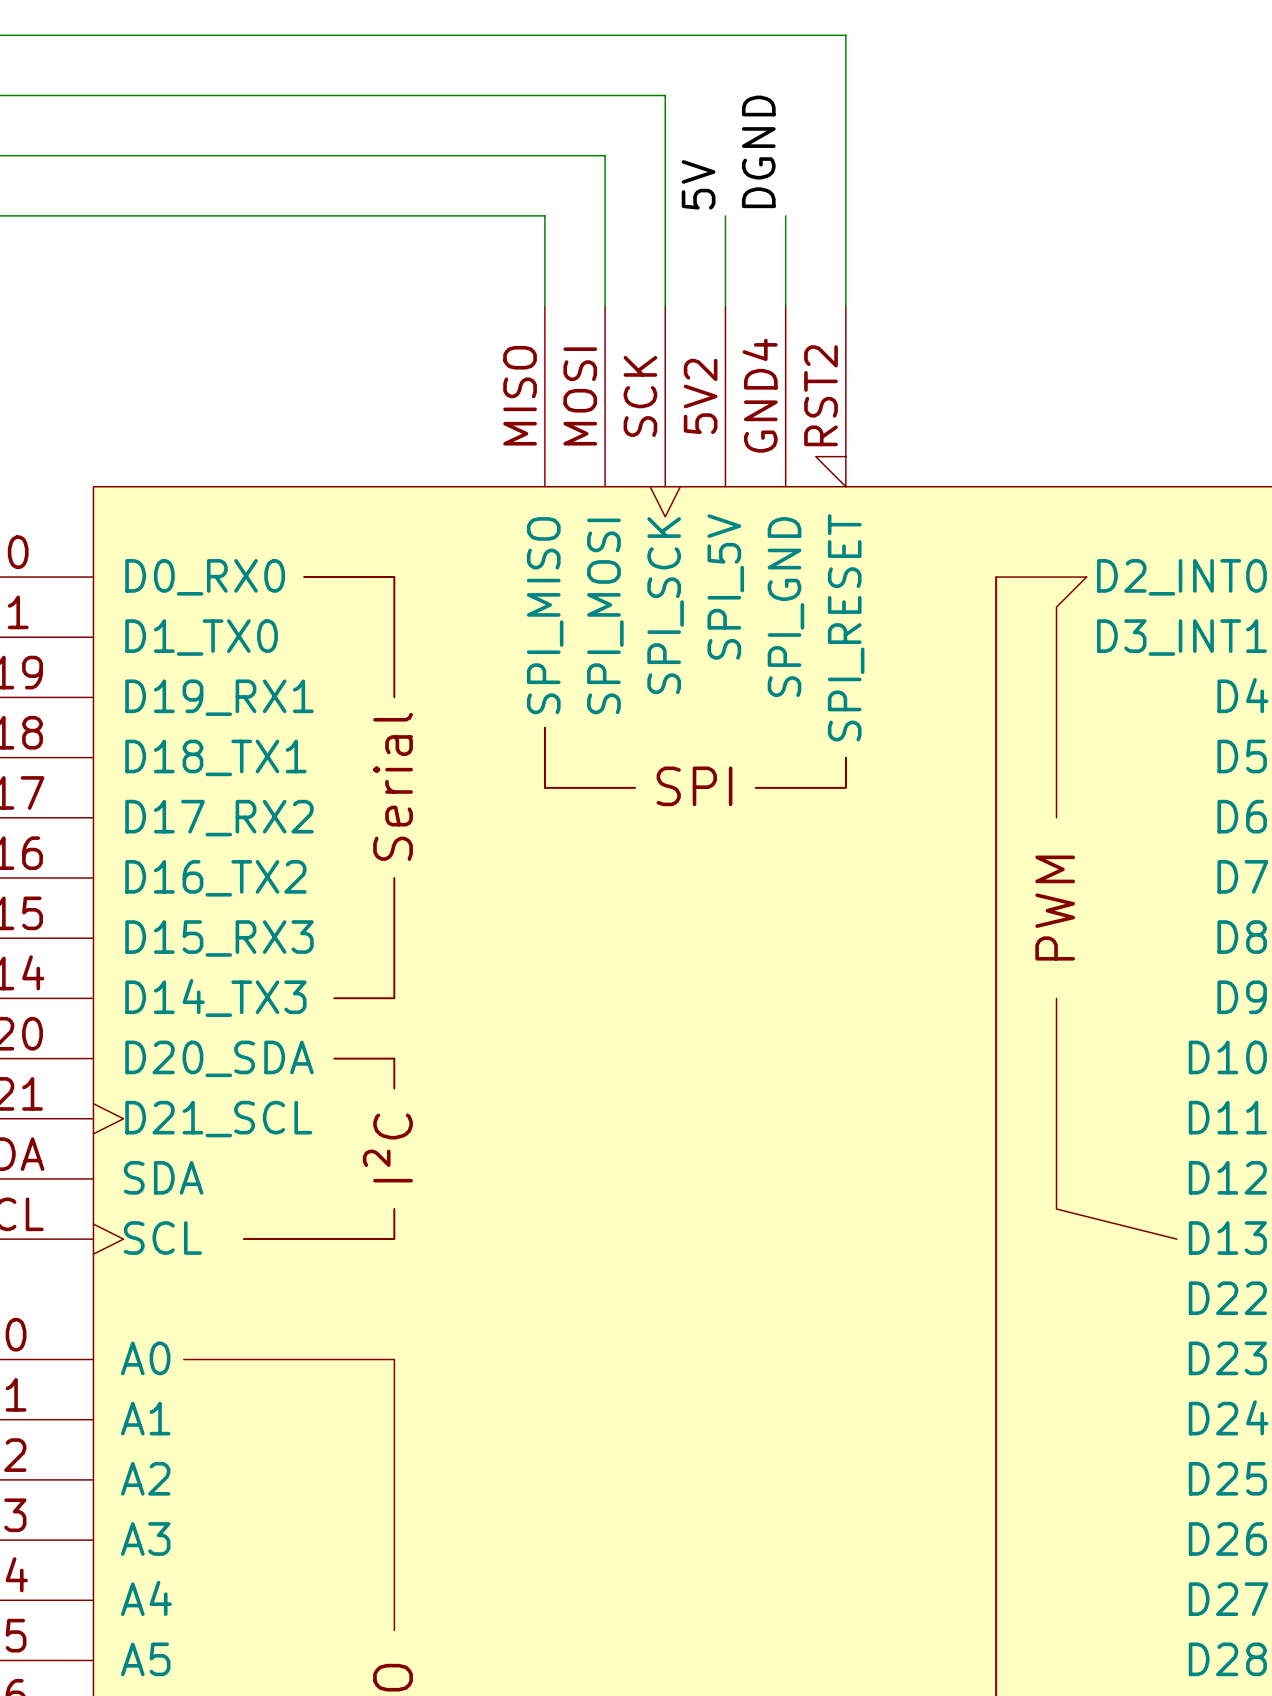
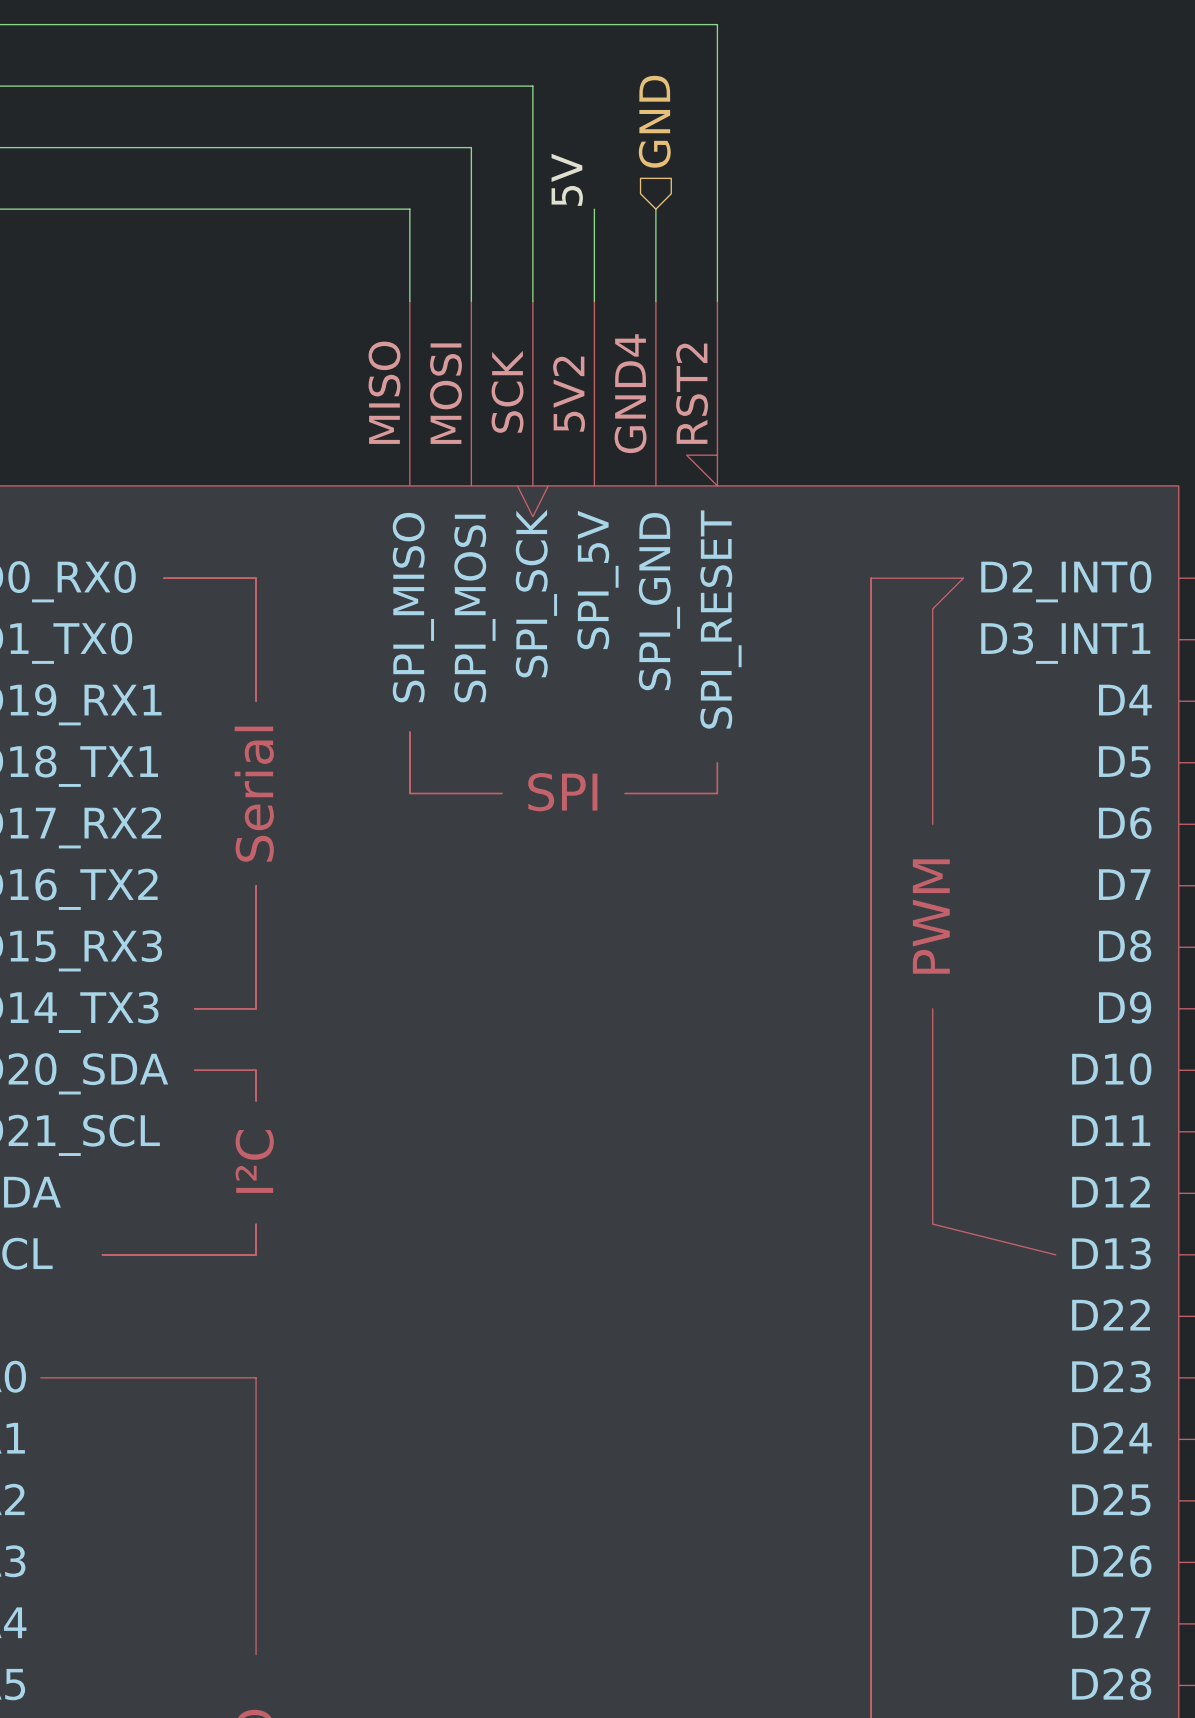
hierarchical label: none -> GND (654, 121)
label: DGND (758, 151) -> none

